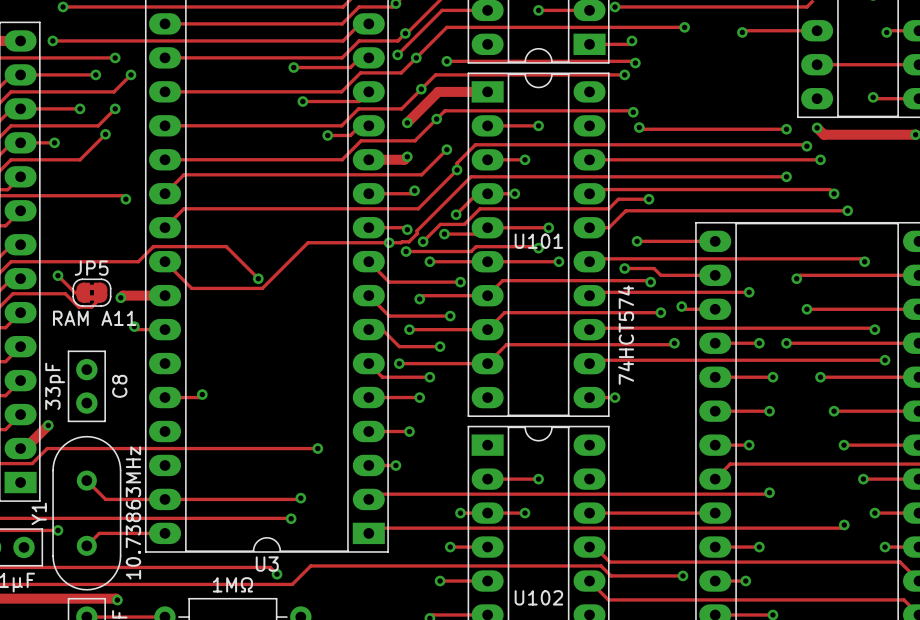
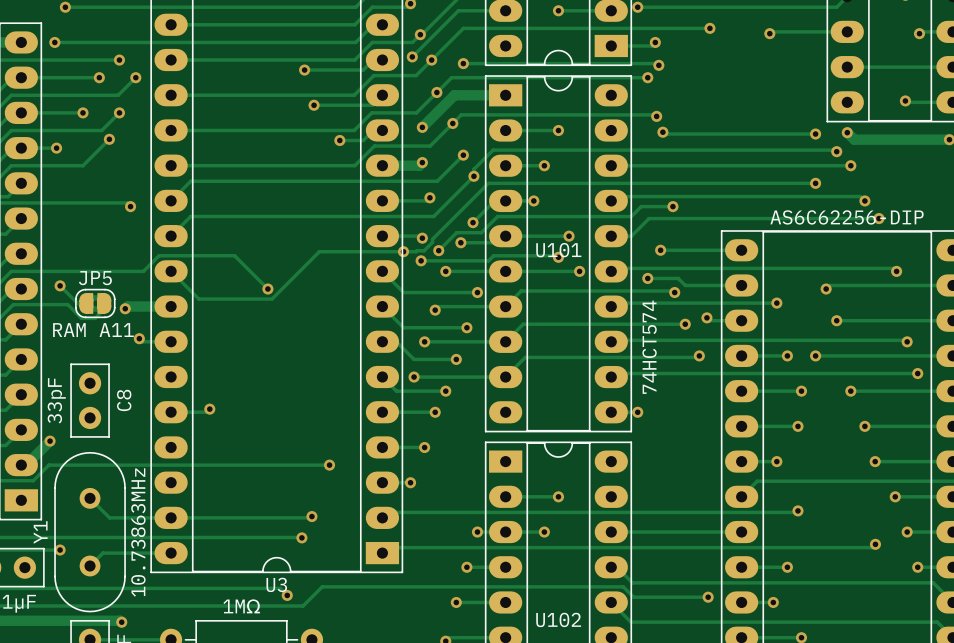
part value: none -> AS6C62256-DIP (847, 217)

